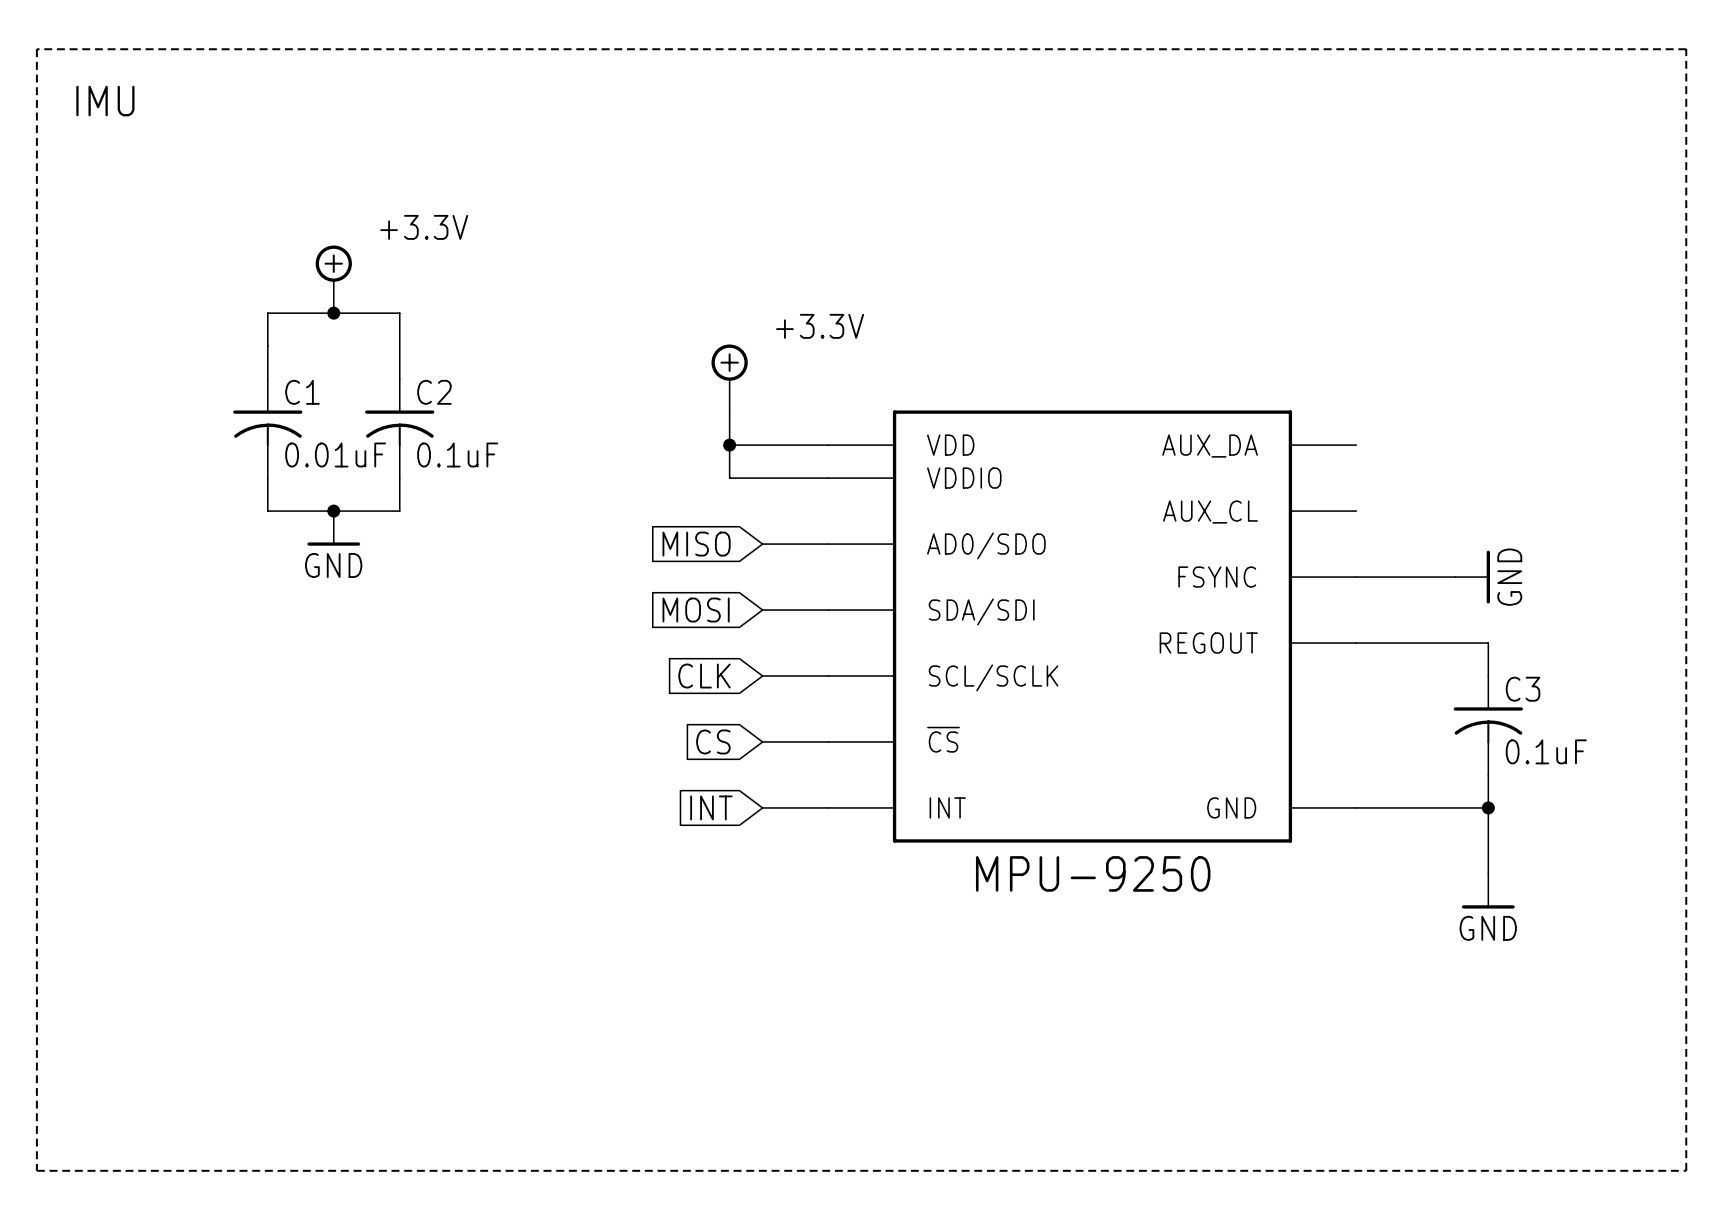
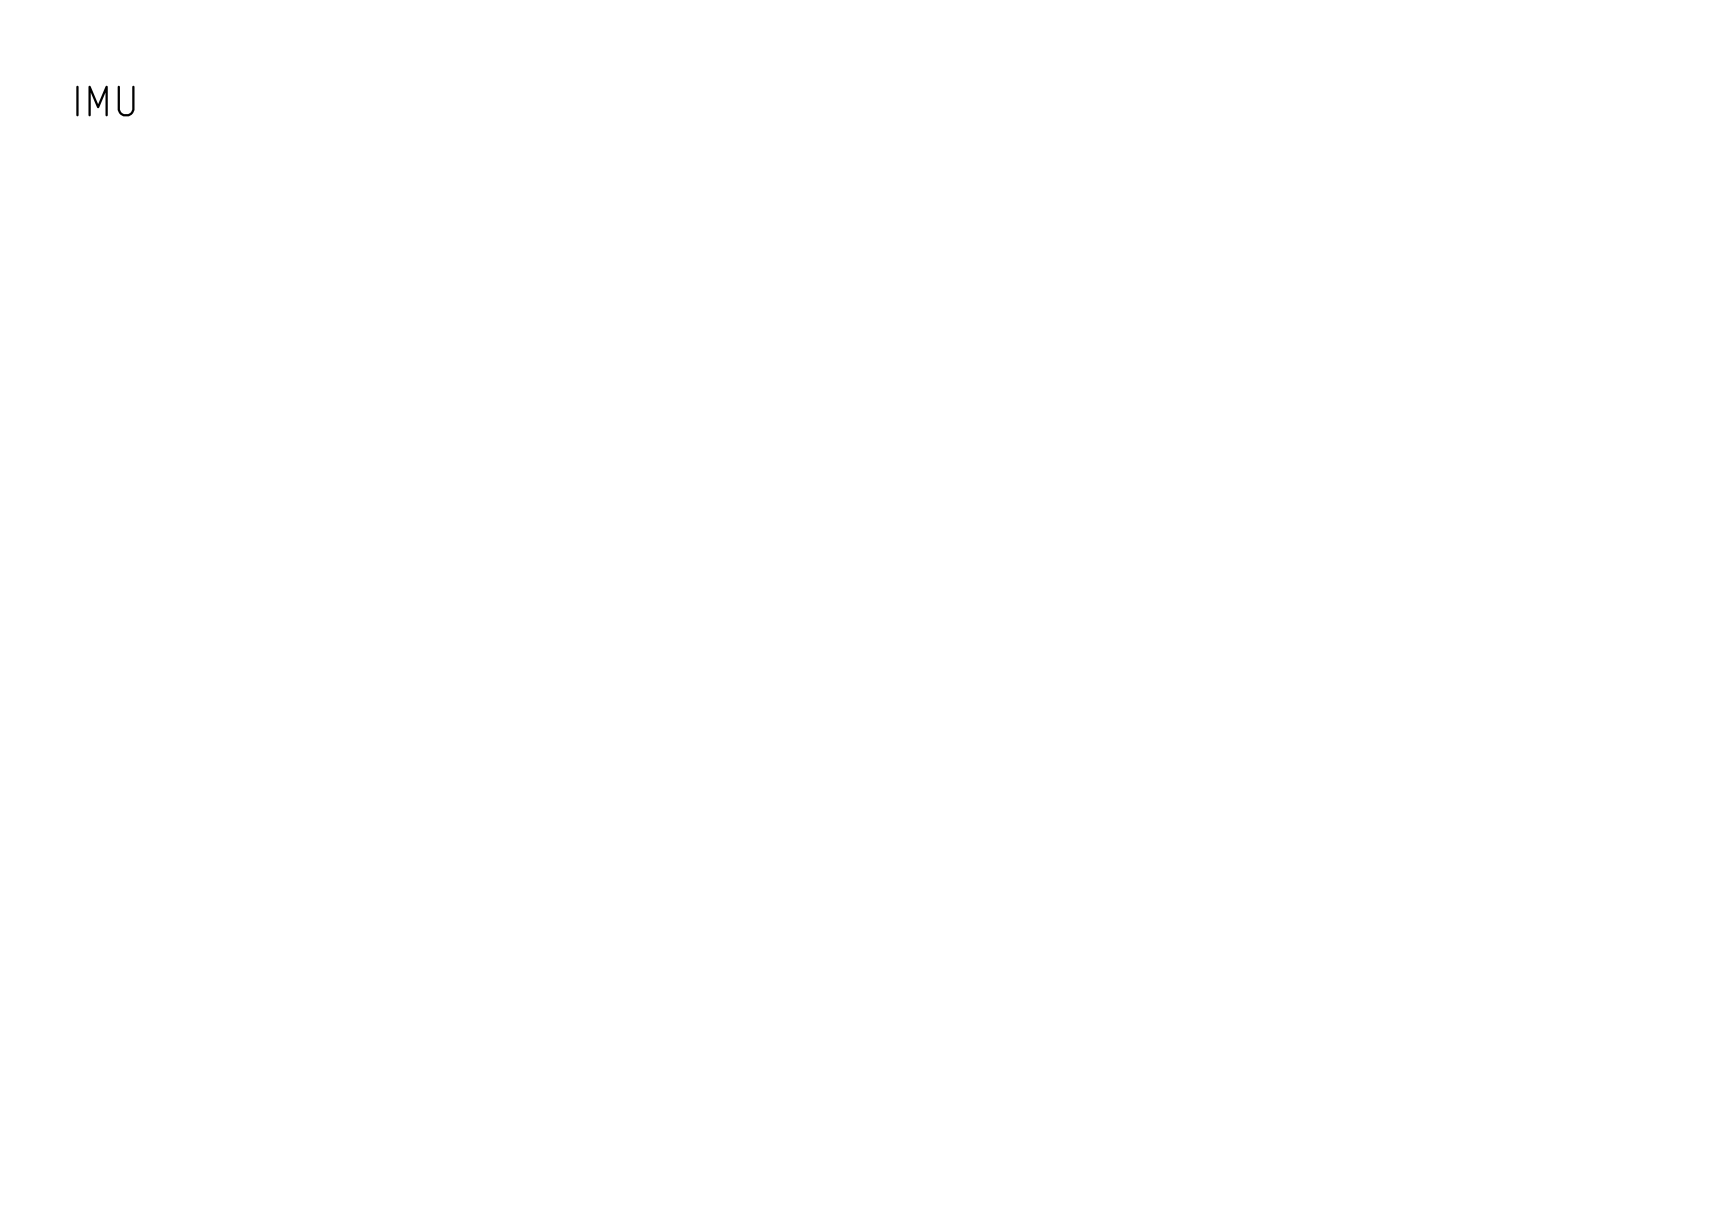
line: (36, 49) (1686, 49) (1686, 1170) (36, 1170) (36, 49) -> none
power symbol: +3.3V (333, 279) -> none
junction: (333, 313) -> none
power symbol: +3.3V (729, 378) -> none
wire: (267, 379) (267, 313) (399, 313) (399, 379) -> none
wire: (729, 412) (729, 478) (828, 478) -> none
C1: 0.01uF (267, 428) -> none
C2: 0.1uF (399, 428) -> none
wire: (729, 445) (828, 445) -> none
junction: (729, 445) -> none
wire: (267, 478) (267, 511) (399, 511) (399, 478) -> none
junction: (333, 511) -> none
power symbol: GND (333, 528) -> none
global label: MISO (696, 544) -> none
wire: (762, 544) (828, 544) -> none
wire: (1356, 577) (1455, 577) -> none
power symbol: GND (1472, 577) -> none
global label: MOSI (696, 610) -> none
wire: (762, 610) (828, 610) -> none
part: MPU-9250 (1092, 626) -> none
wire: (1356, 643) (1488, 643) (1488, 676) -> none
global label: CLK (704, 676) -> none
wire: (762, 676) (828, 676) -> none
C3: 0.1uF (1488, 725) -> none
global label: CS (713, 741) -> none
wire: (762, 741) (828, 741) -> none
wire: (1488, 774) (1488, 873) -> none
global label: INT (711, 807) -> none
wire: (762, 807) (828, 807) -> none
wire: (1356, 807) (1488, 807) -> none
junction: (1488, 807) -> none
power symbol: GND (1488, 891) -> none

